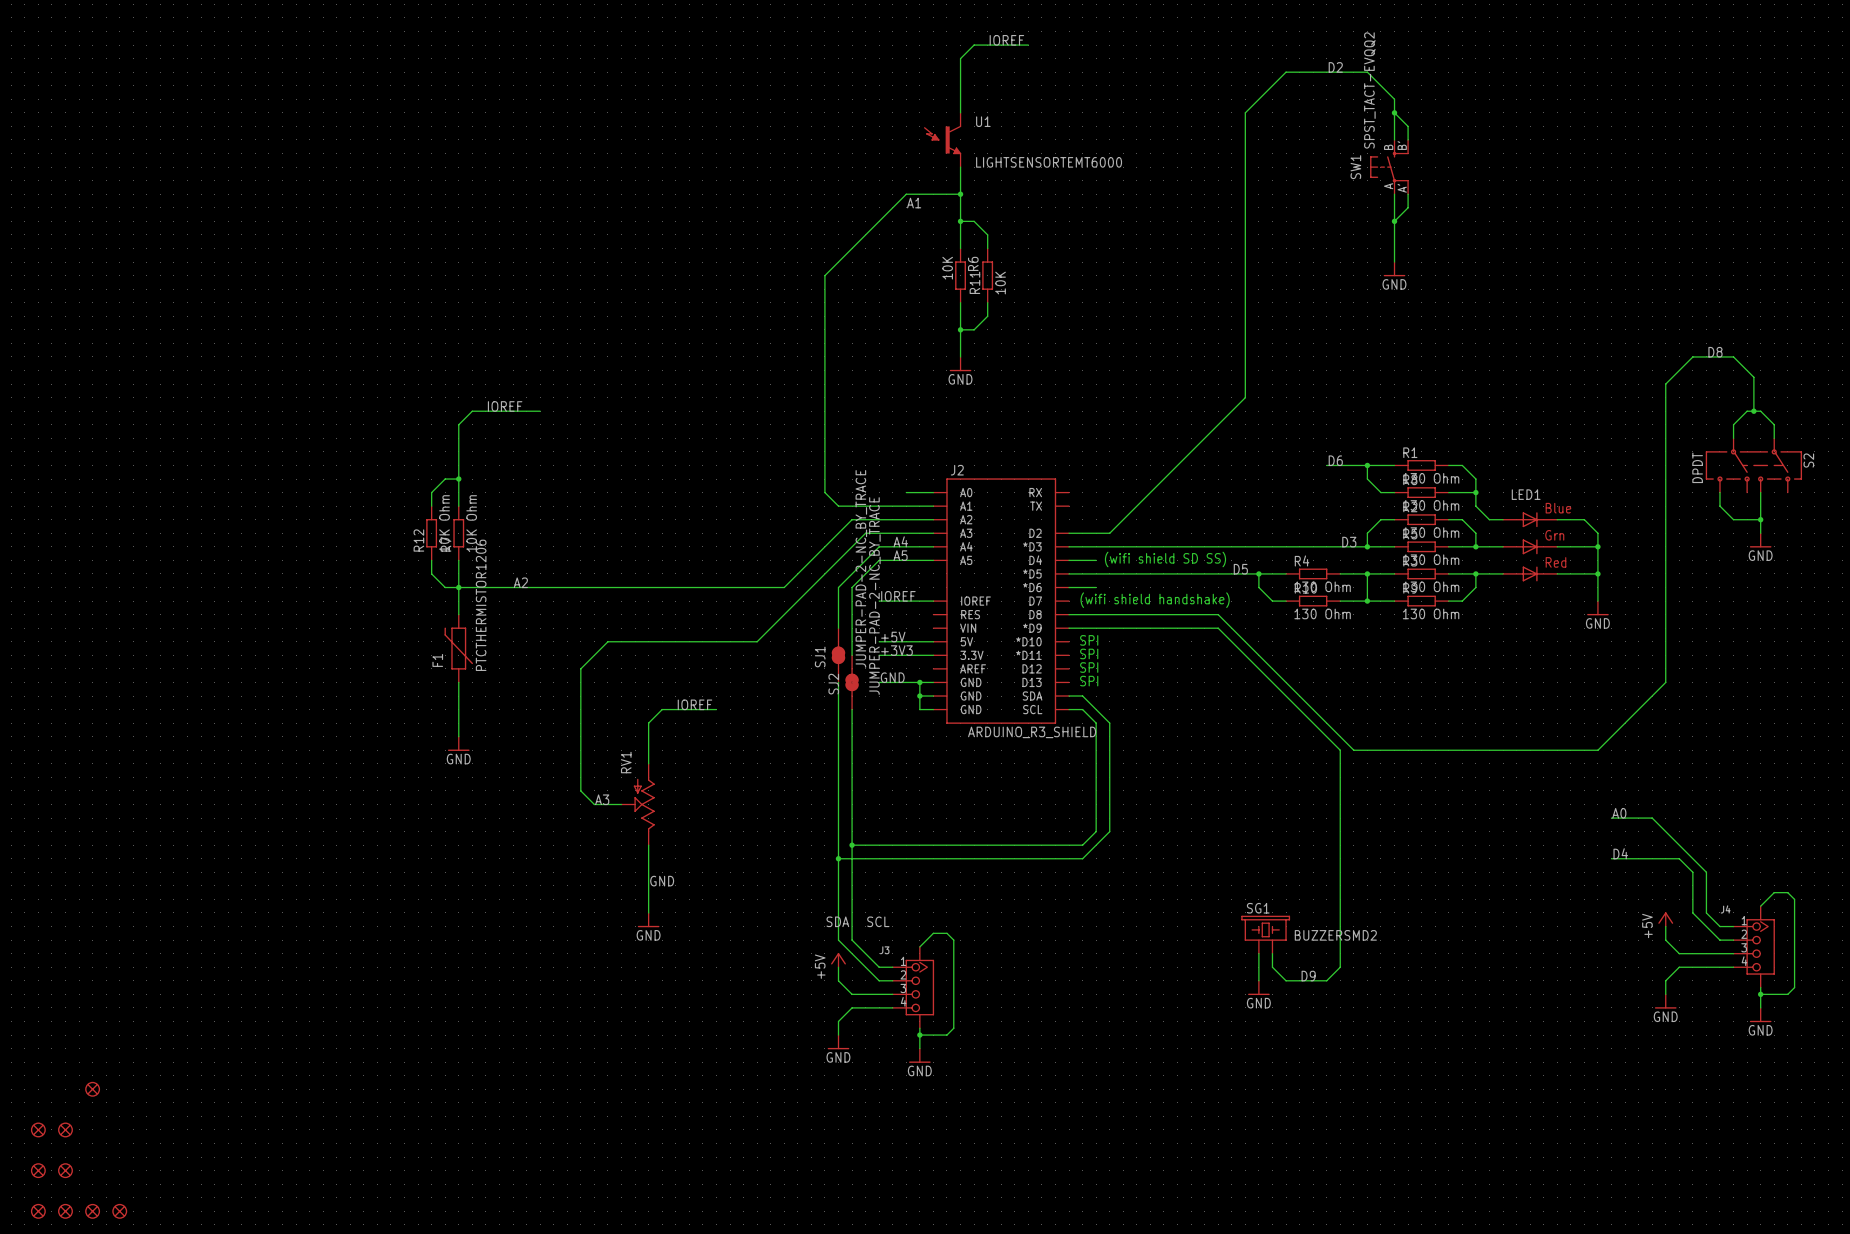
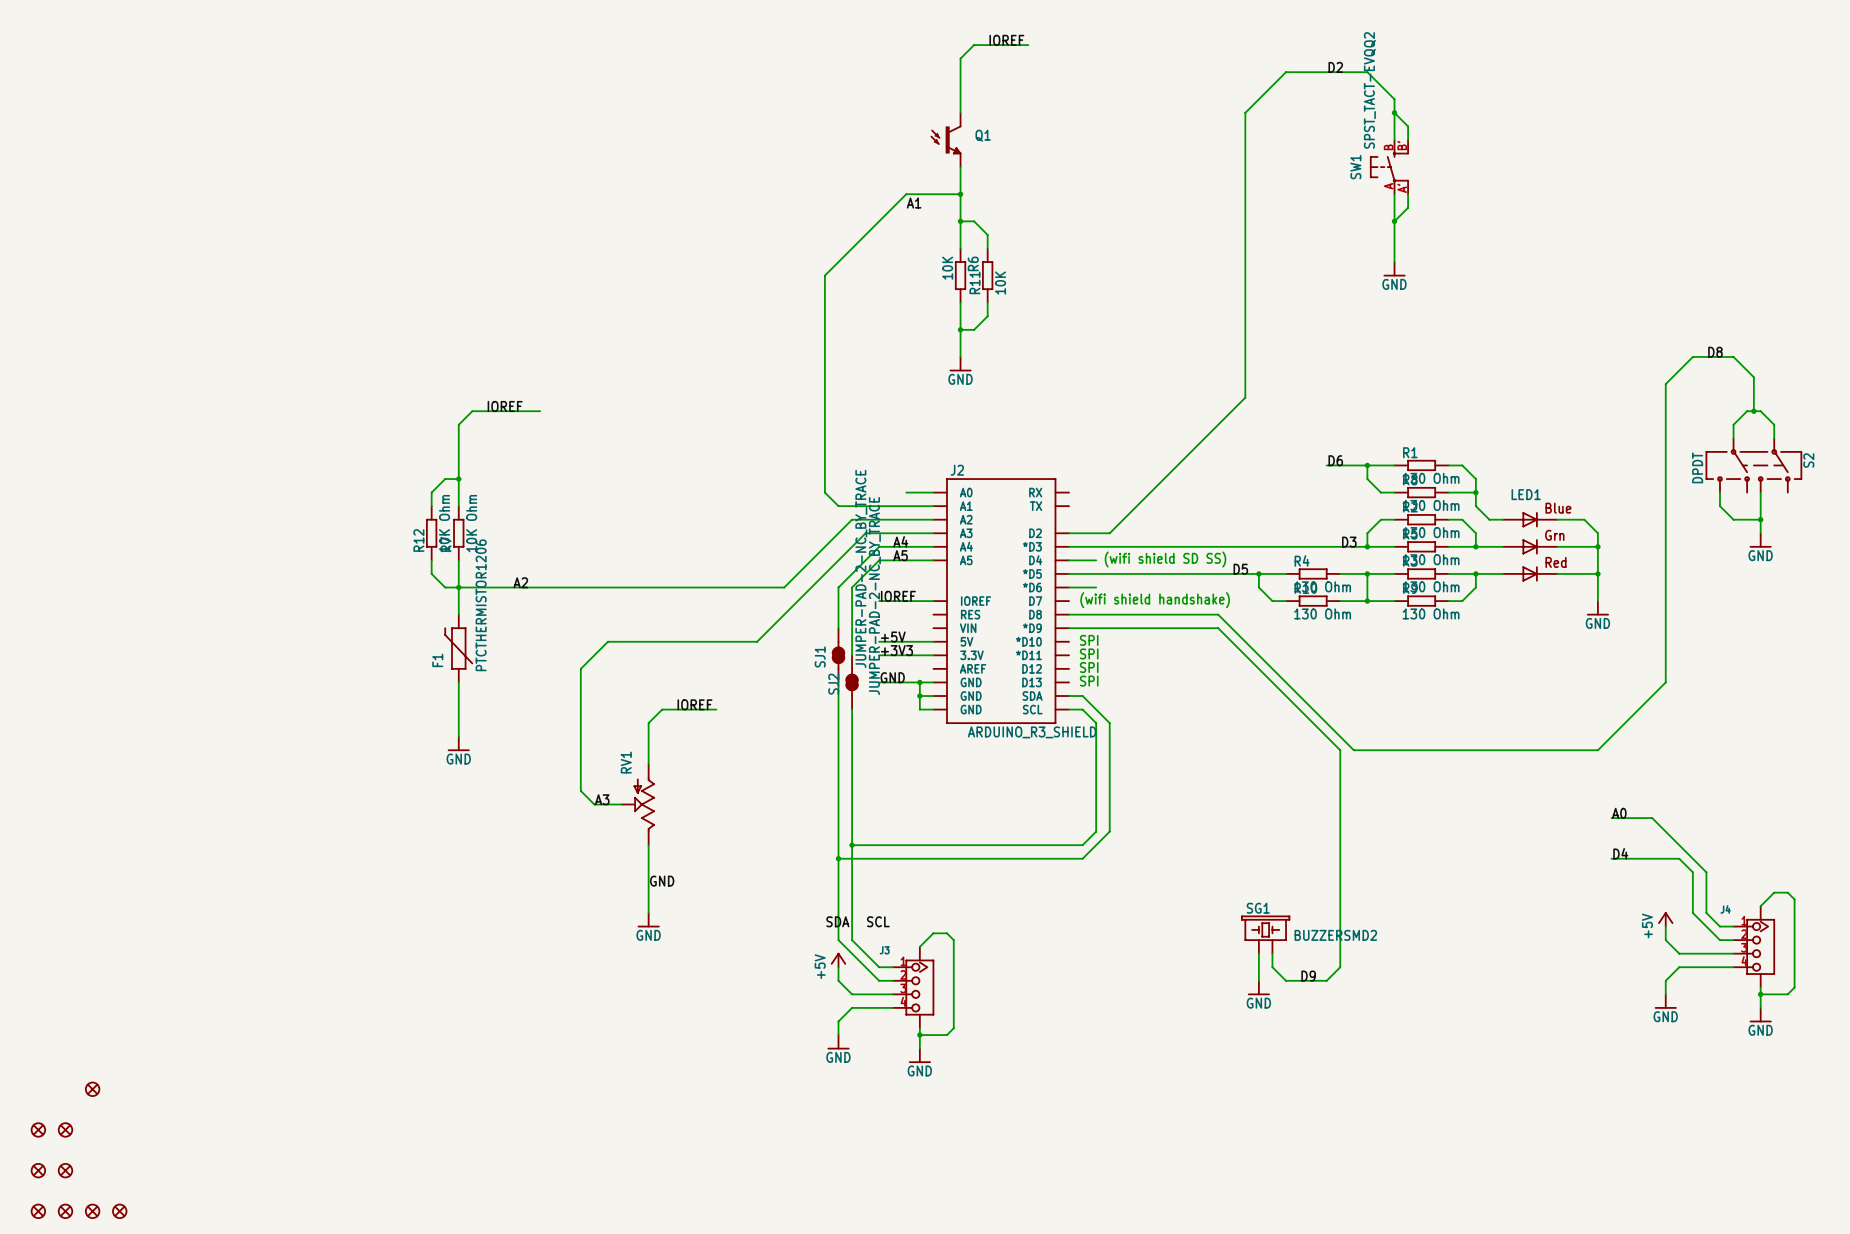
U1: LIGHTSENSORTEMT6000 (942, 139) -> none
Q1: none -> (945, 139)

